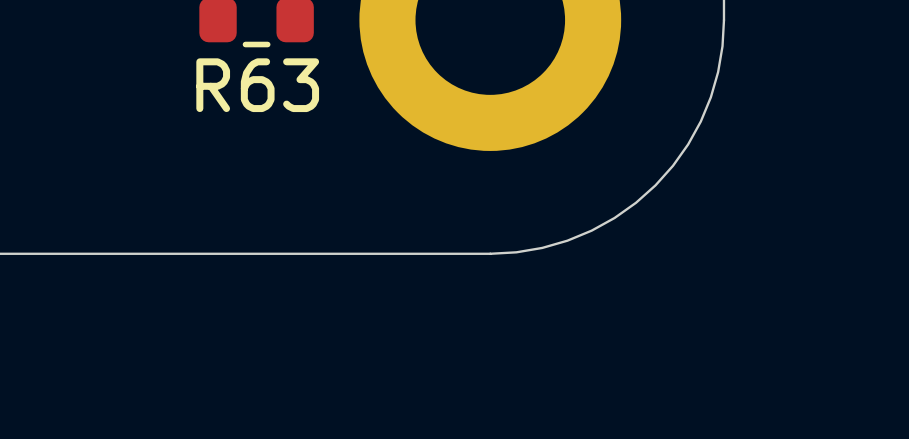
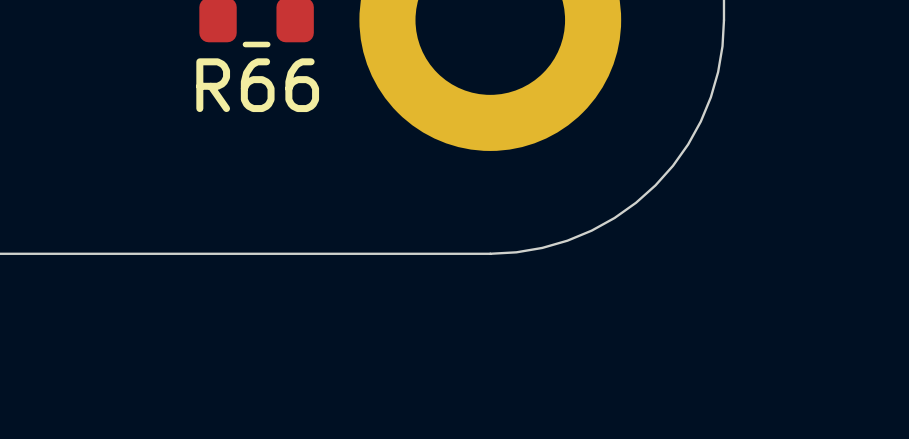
R63 name: R63 (257, 85) -> R66 (257, 85)

